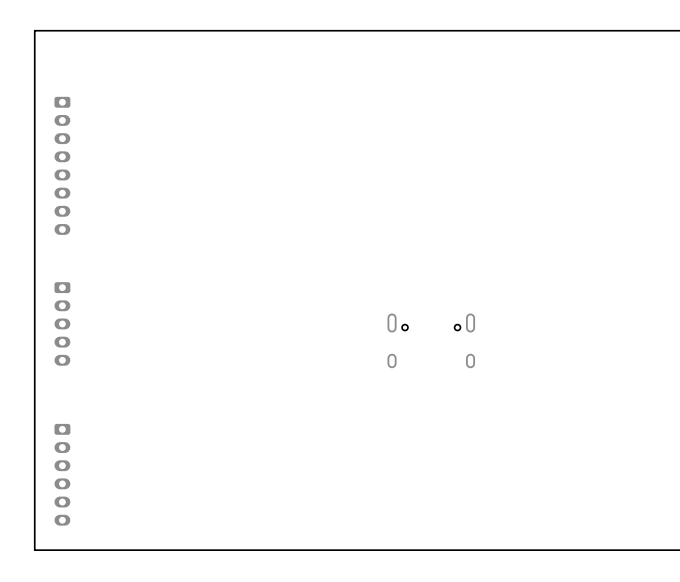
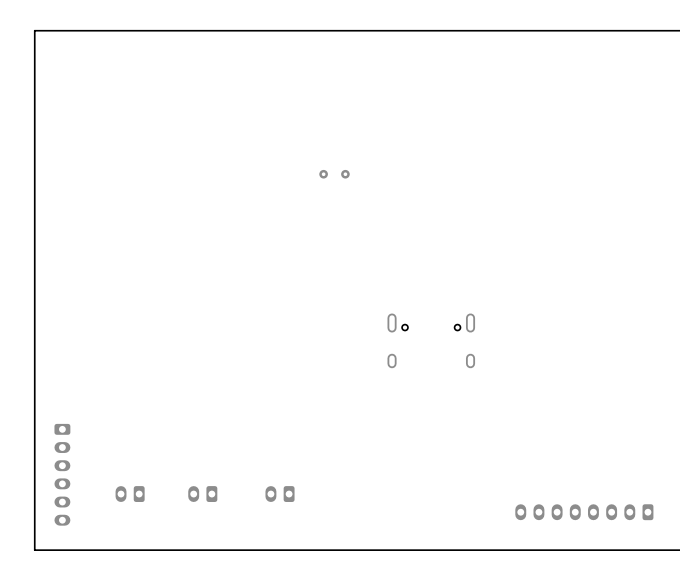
part: (62, 165) -> none
part: none -> (334, 174)
part: (62, 323) -> none
part: none -> (130, 494)
part: none -> (202, 494)
part: none -> (280, 494)
part: none -> (584, 512)

